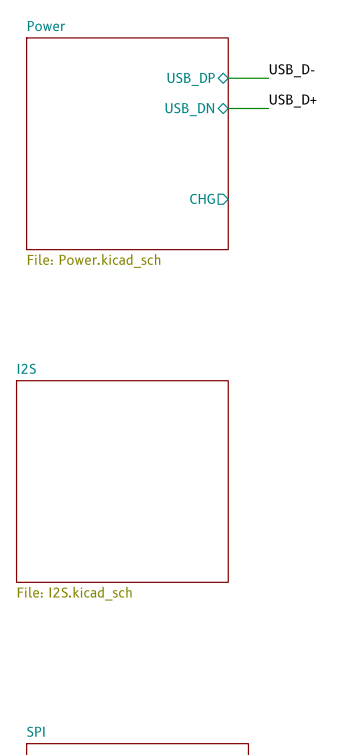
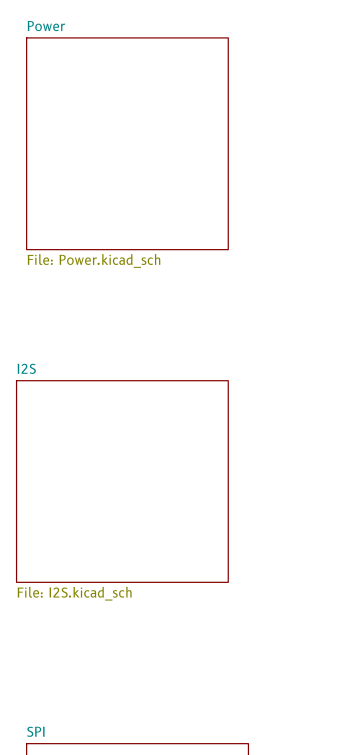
label: USB_D- (291, 70) -> none
wire: (228, 78) (268, 78) -> none
sheet pin: USB_DP (191, 79) -> none
label: USB_D+ (292, 101) -> none
wire: (228, 108) (268, 108) -> none
sheet pin: USB_DN (189, 109) -> none
sheet pin: CHG (202, 198) -> none

